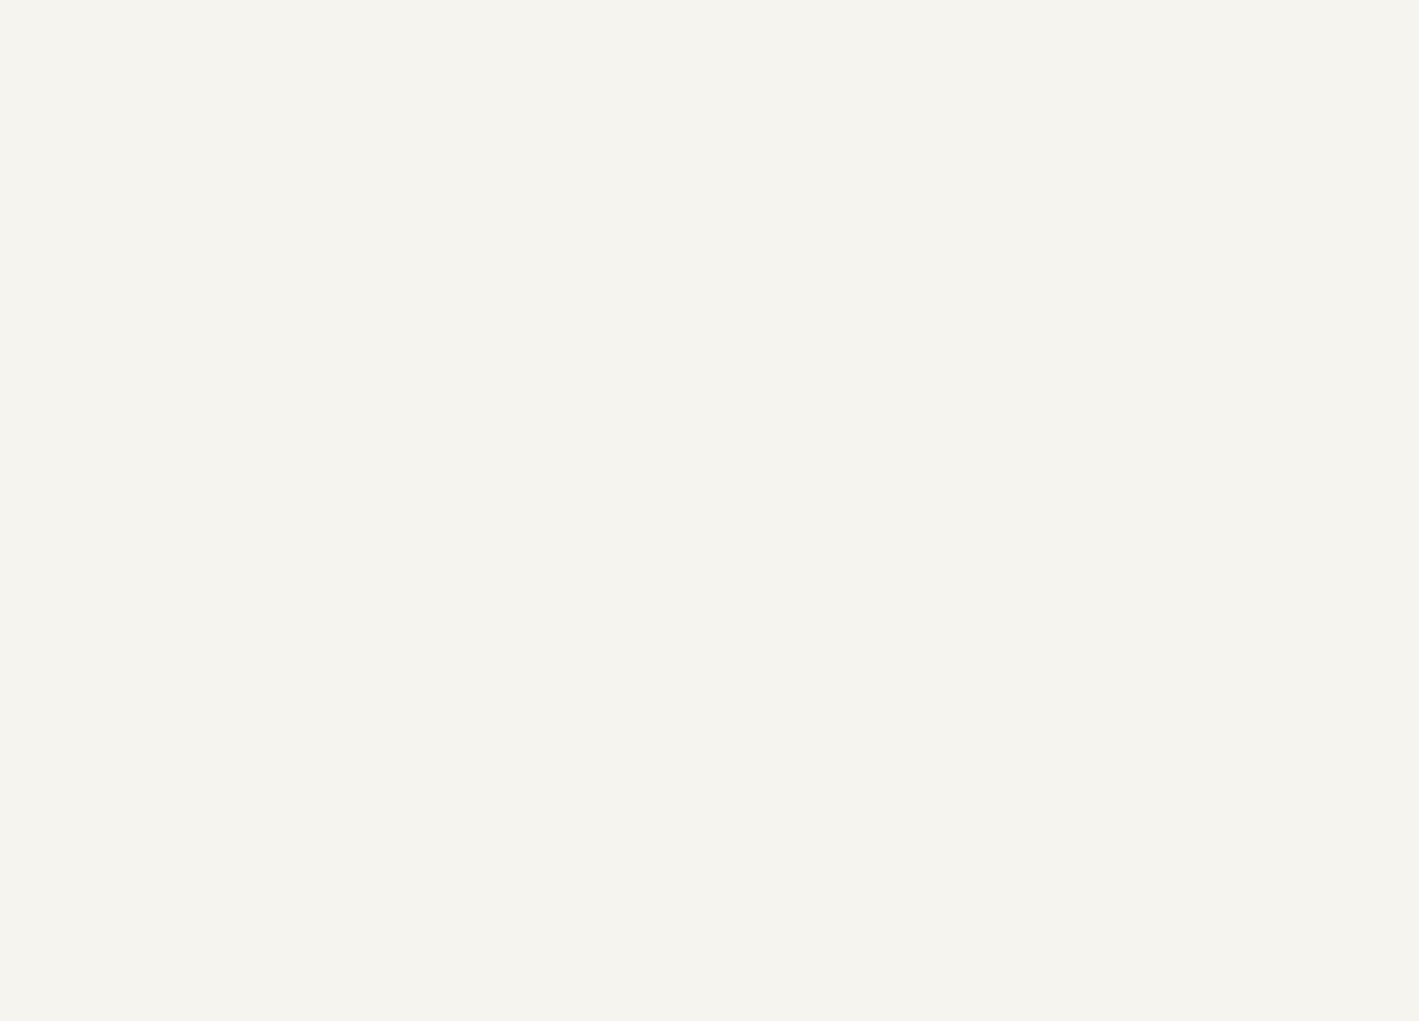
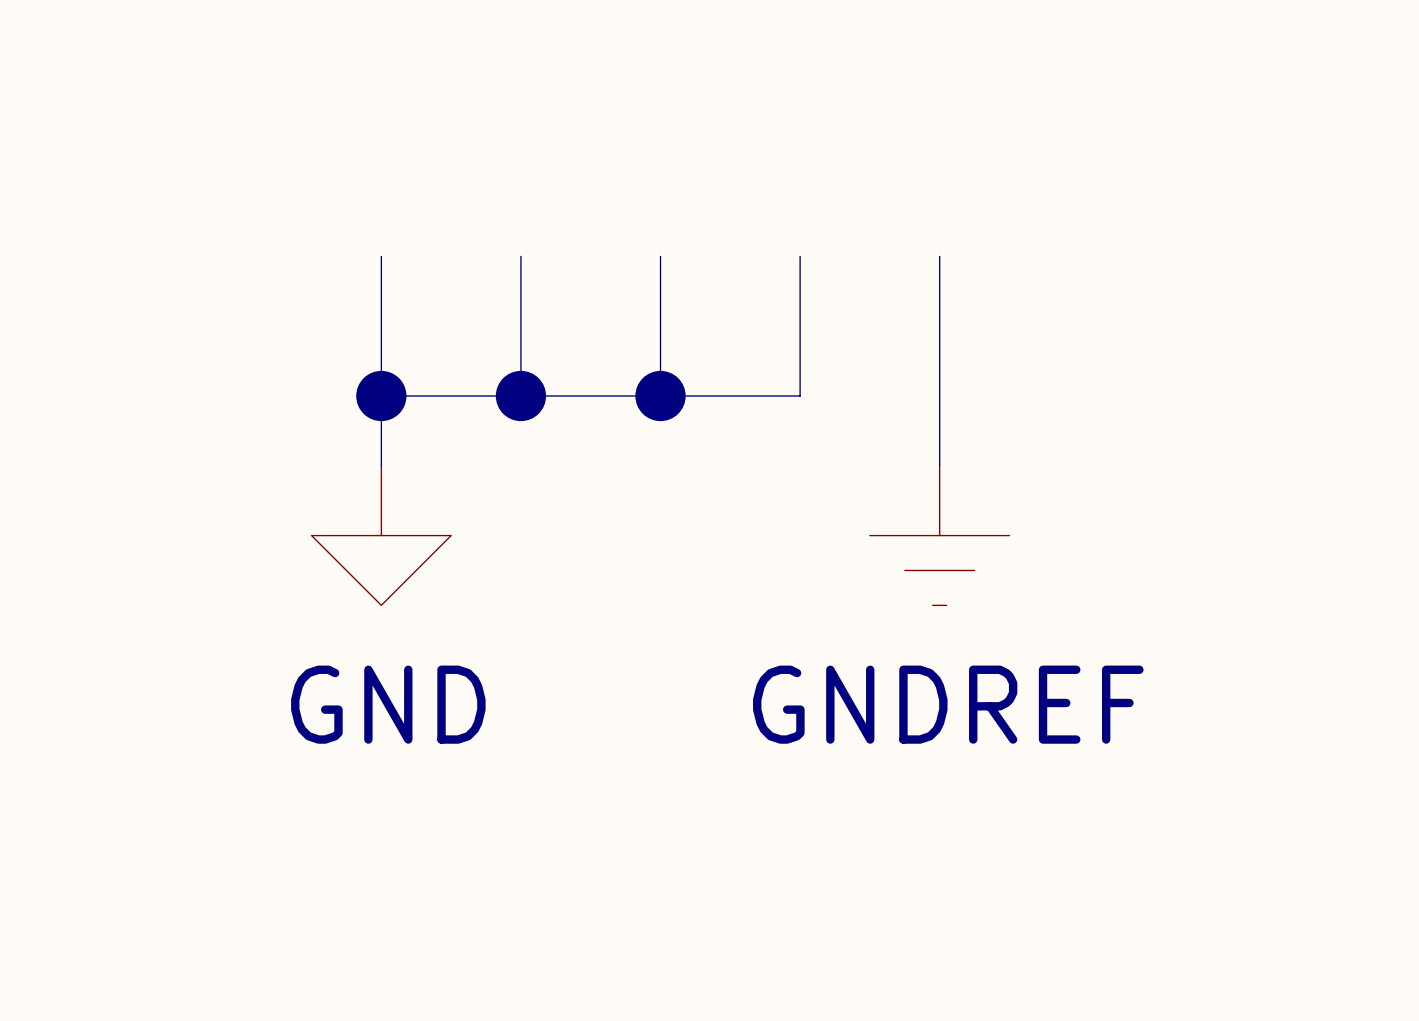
wire: none -> (381, 256) (381, 465)
wire: none -> (520, 256) (520, 396)
wire: none -> (660, 256) (660, 396)
wire: none -> (800, 256) (800, 396) (381, 396)
wire: none -> (939, 256) (939, 465)
junction: none -> (381, 396)
junction: none -> (520, 396)
junction: none -> (660, 396)
power symbol: none -> GND (381, 535)
power symbol: none -> GNDREF (939, 535)

